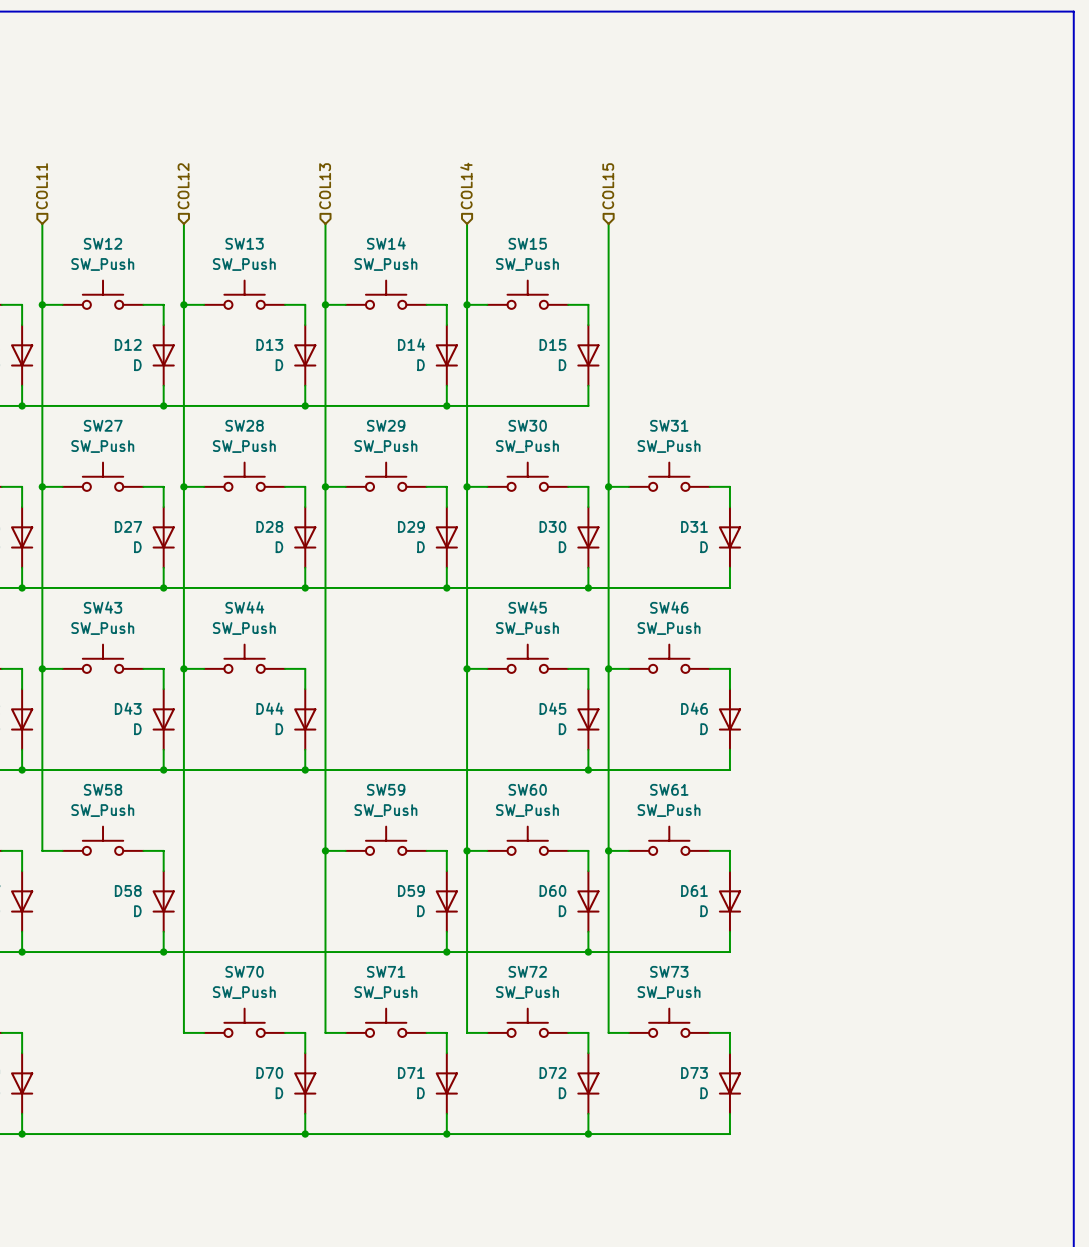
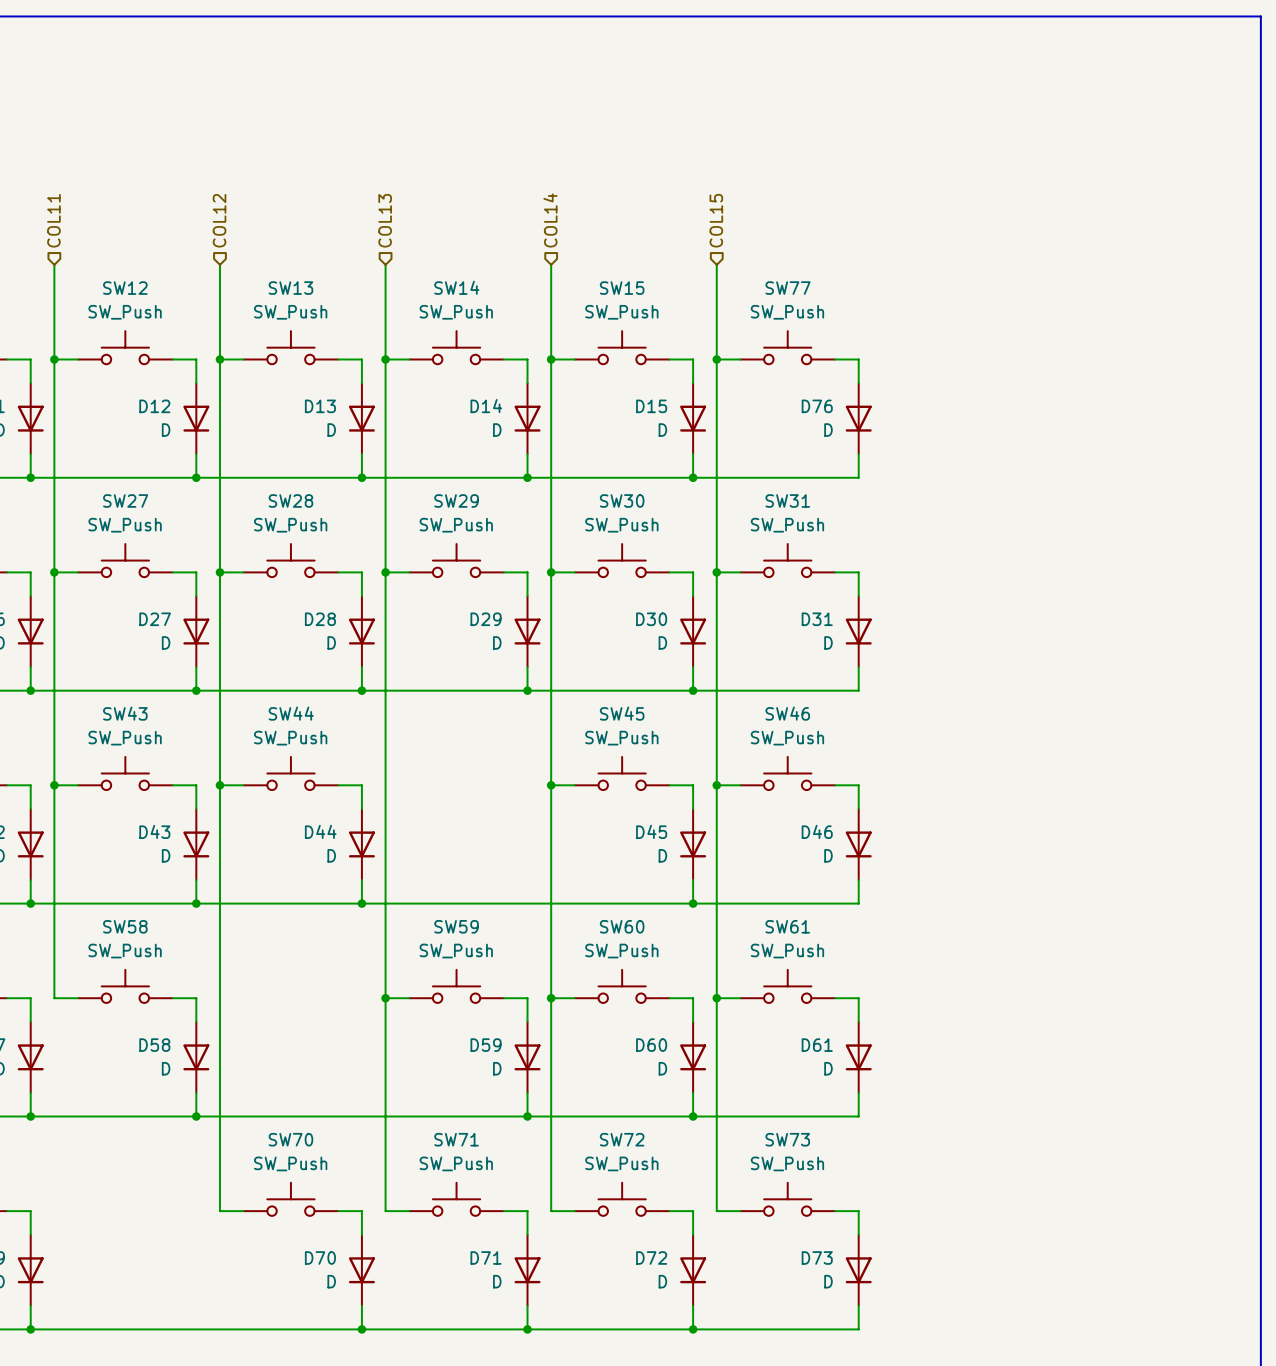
SW77: none -> SW_Push (787, 347)
wire: none -> (716, 359) (740, 359)
junction: none -> (716, 359)
wire: none -> (835, 359) (858, 359) (858, 383)
D76: none -> D (858, 418)
wire: none -> (858, 454) (858, 477) (693, 477)
junction: none -> (693, 477)

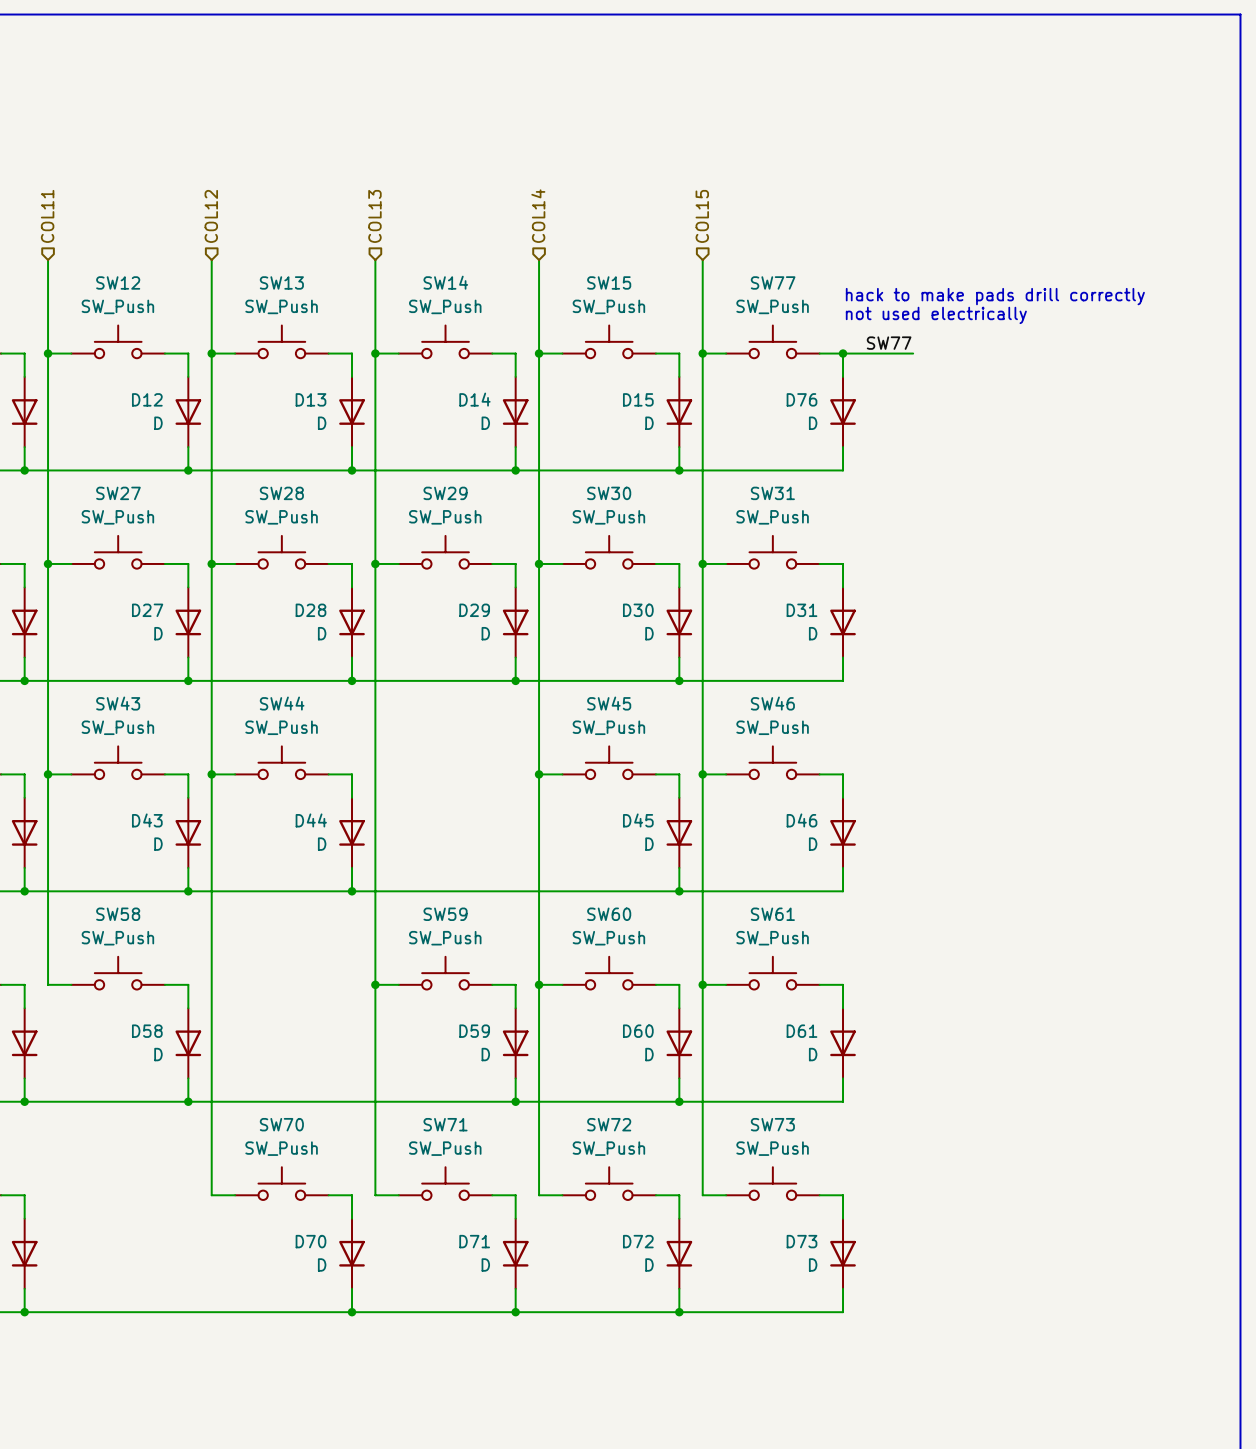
text: none -> hack to make pads drill correctly (995, 296)
text: none -> not used electrically (936, 315)
label: none -> SW77 (889, 343)
wire: none -> (843, 353) (913, 353)
junction: none -> (843, 353)

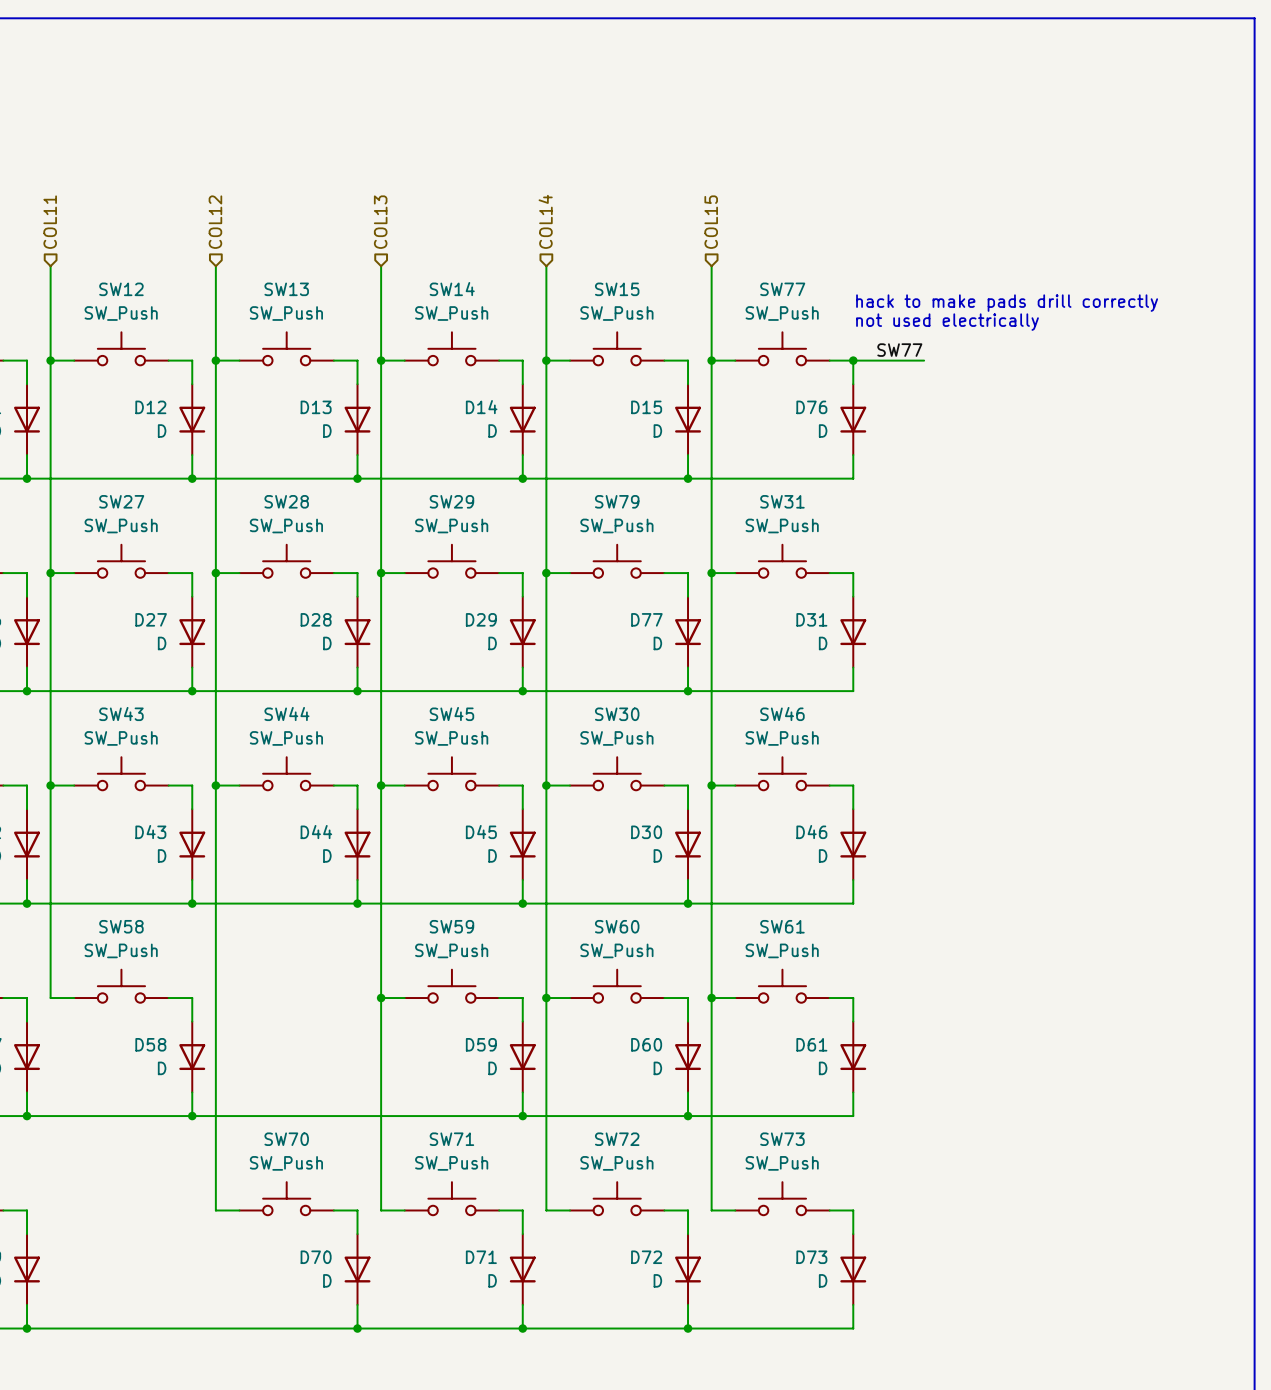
SW30 name: SW30 (609, 493) -> SW79 (617, 501)
D30 name: D30 (638, 610) -> D77 (646, 619)
SW45 name: SW45 (609, 703) -> SW30 (617, 714)
SW45: none -> SW_Push (451, 773)
wire: none -> (381, 785) (404, 785)
junction: none -> (381, 785)
wire: none -> (499, 785) (522, 785) (522, 809)
D45 name: D45 (638, 820) -> D30 (646, 832)
D45: none -> D (522, 844)
wire: none -> (522, 879) (522, 903)
junction: none -> (522, 903)

